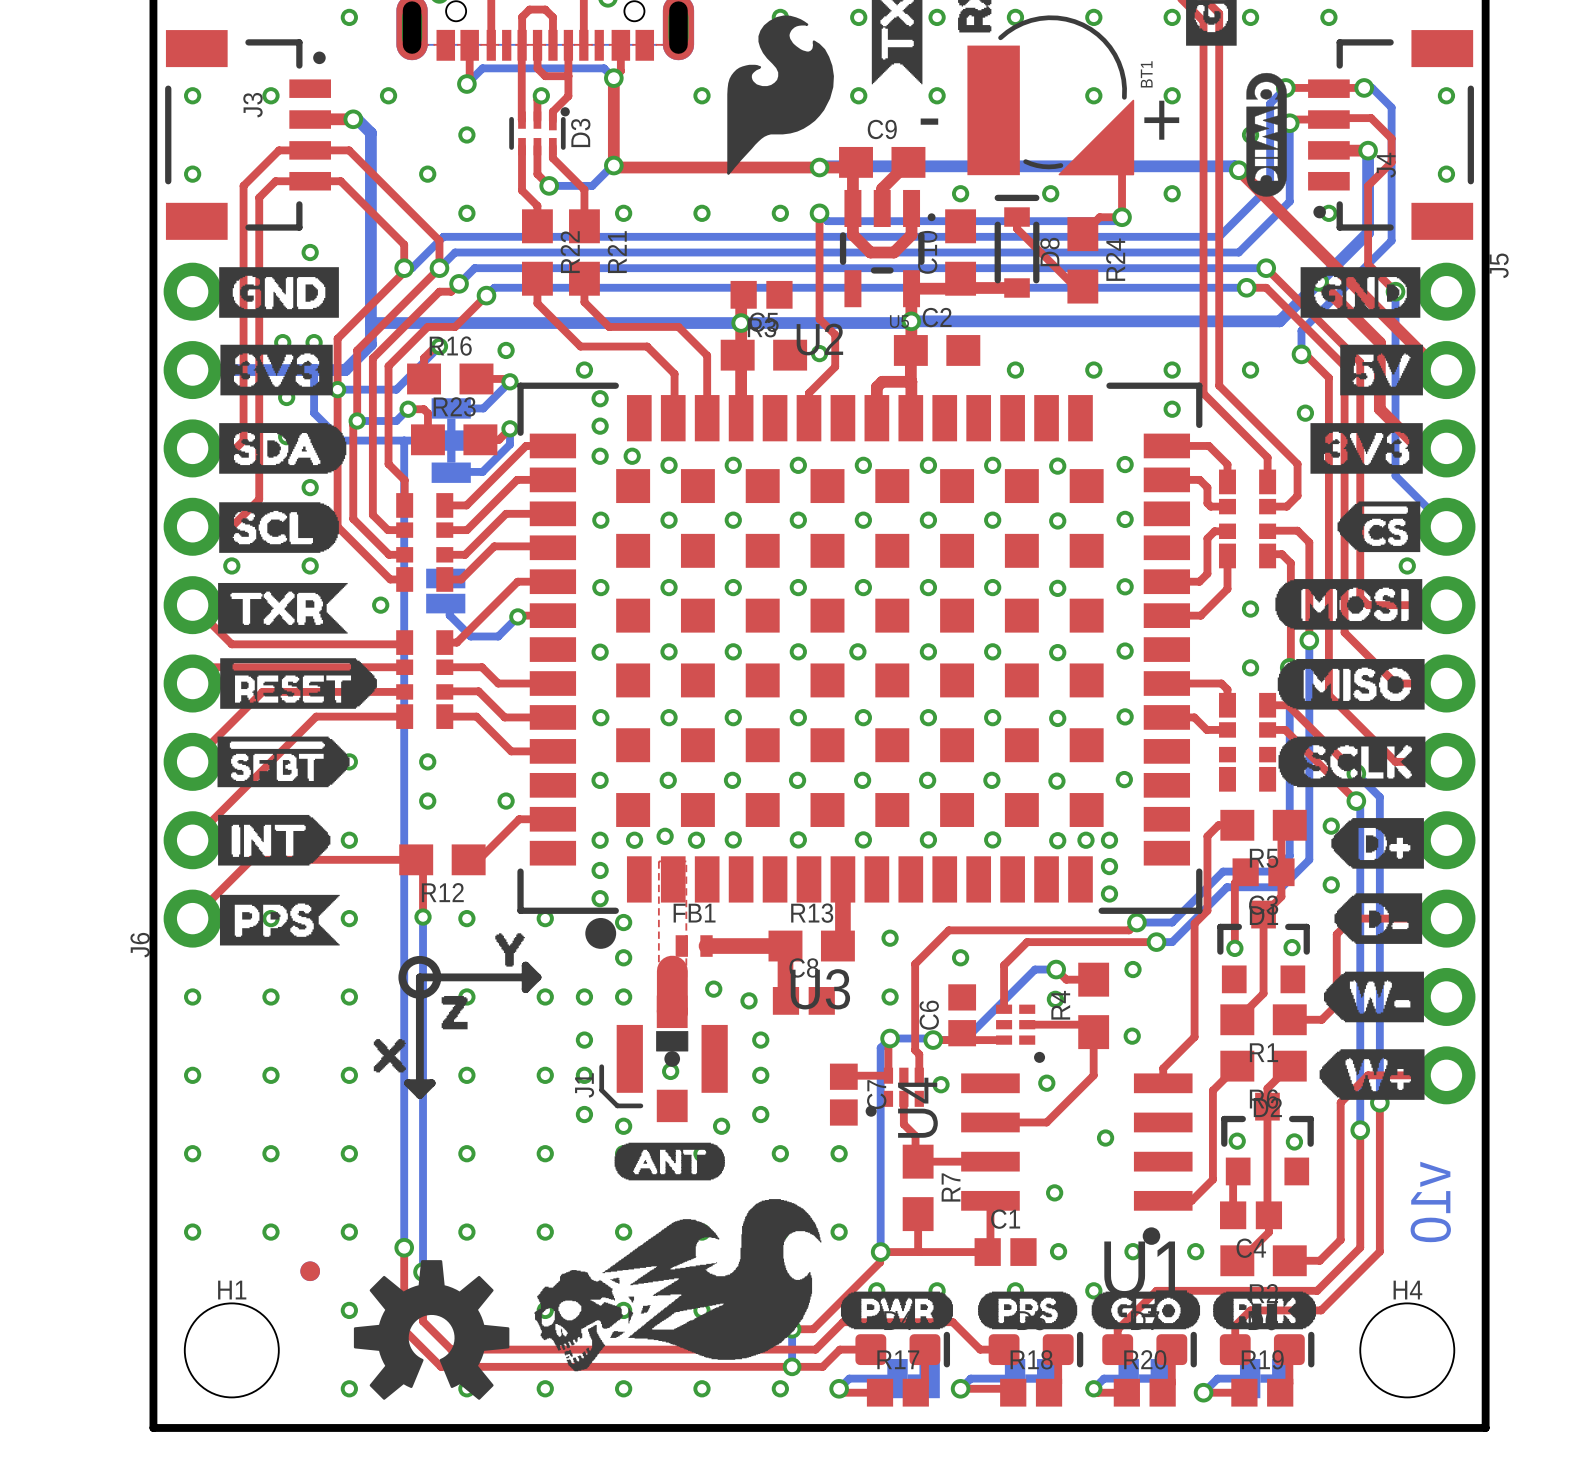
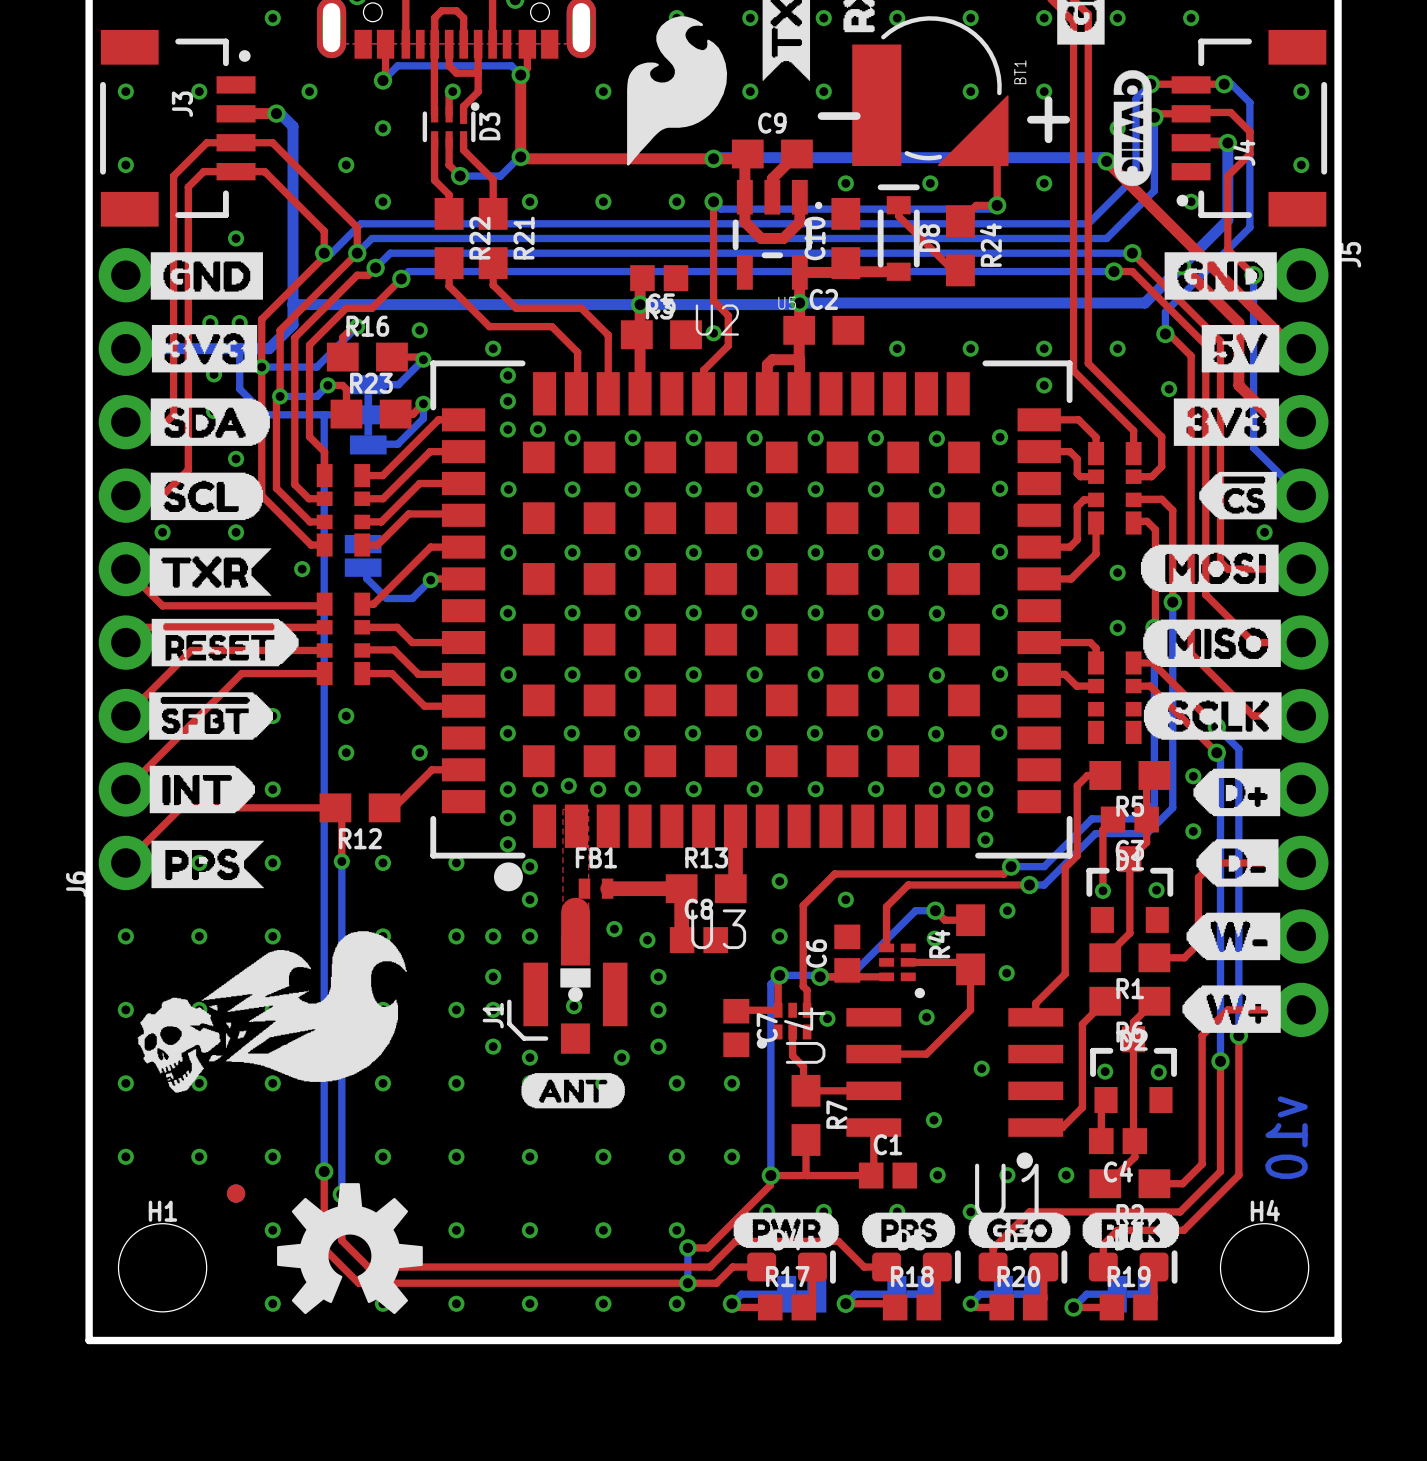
drawing: [495, 933, 525, 967] -> none
drawing: [398, 955, 468, 1030] -> none
line: (537, 977) (419, 977) (419, 1094) -> none
line: (537, 977) (525, 989) (525, 965) (537, 977) -> none
drawing: [373, 1039, 406, 1073] -> none
line: (419, 1094) (408, 1083) (431, 1083) (419, 1094) -> none
drawing position: (677, 1285) -> (272, 1011)

